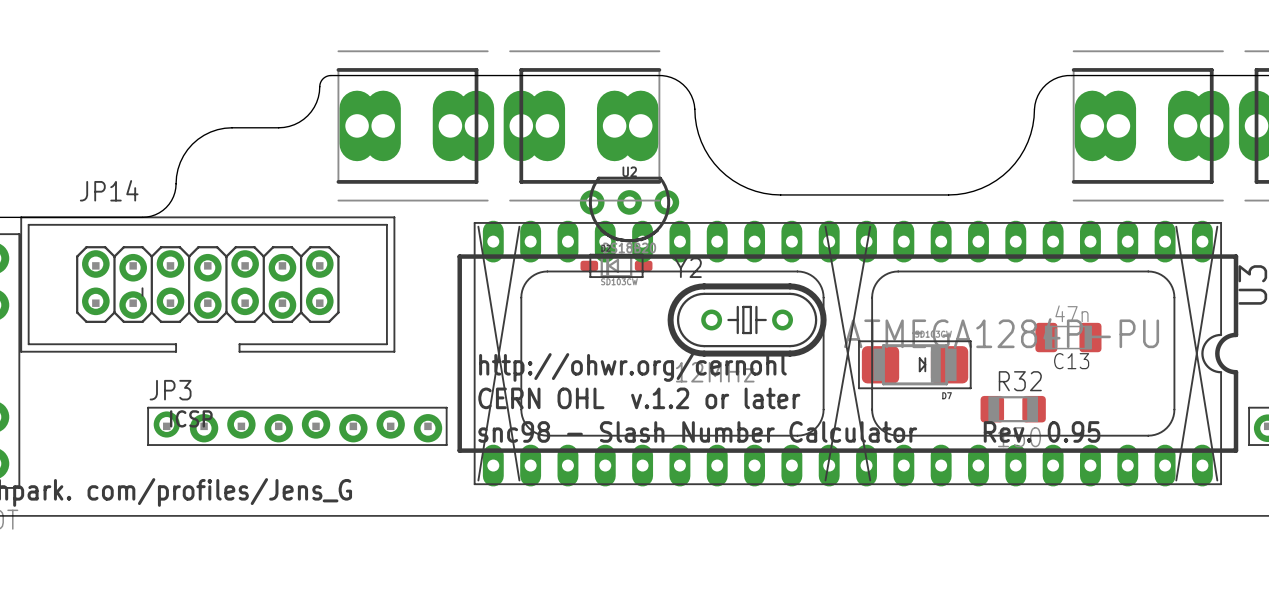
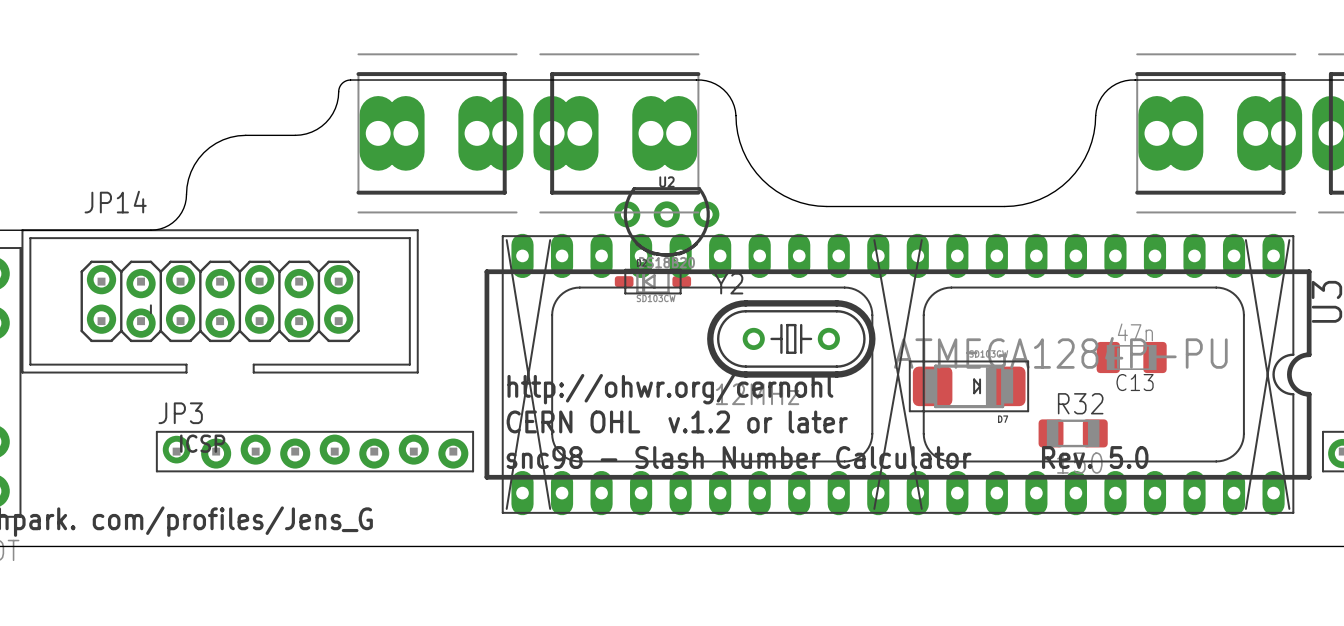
text: snc98 - Slash Number Calculator Rev. 0.95 (789, 431) -> snc98 - Slash Number Calculator Rev. 5.0 (827, 457)

